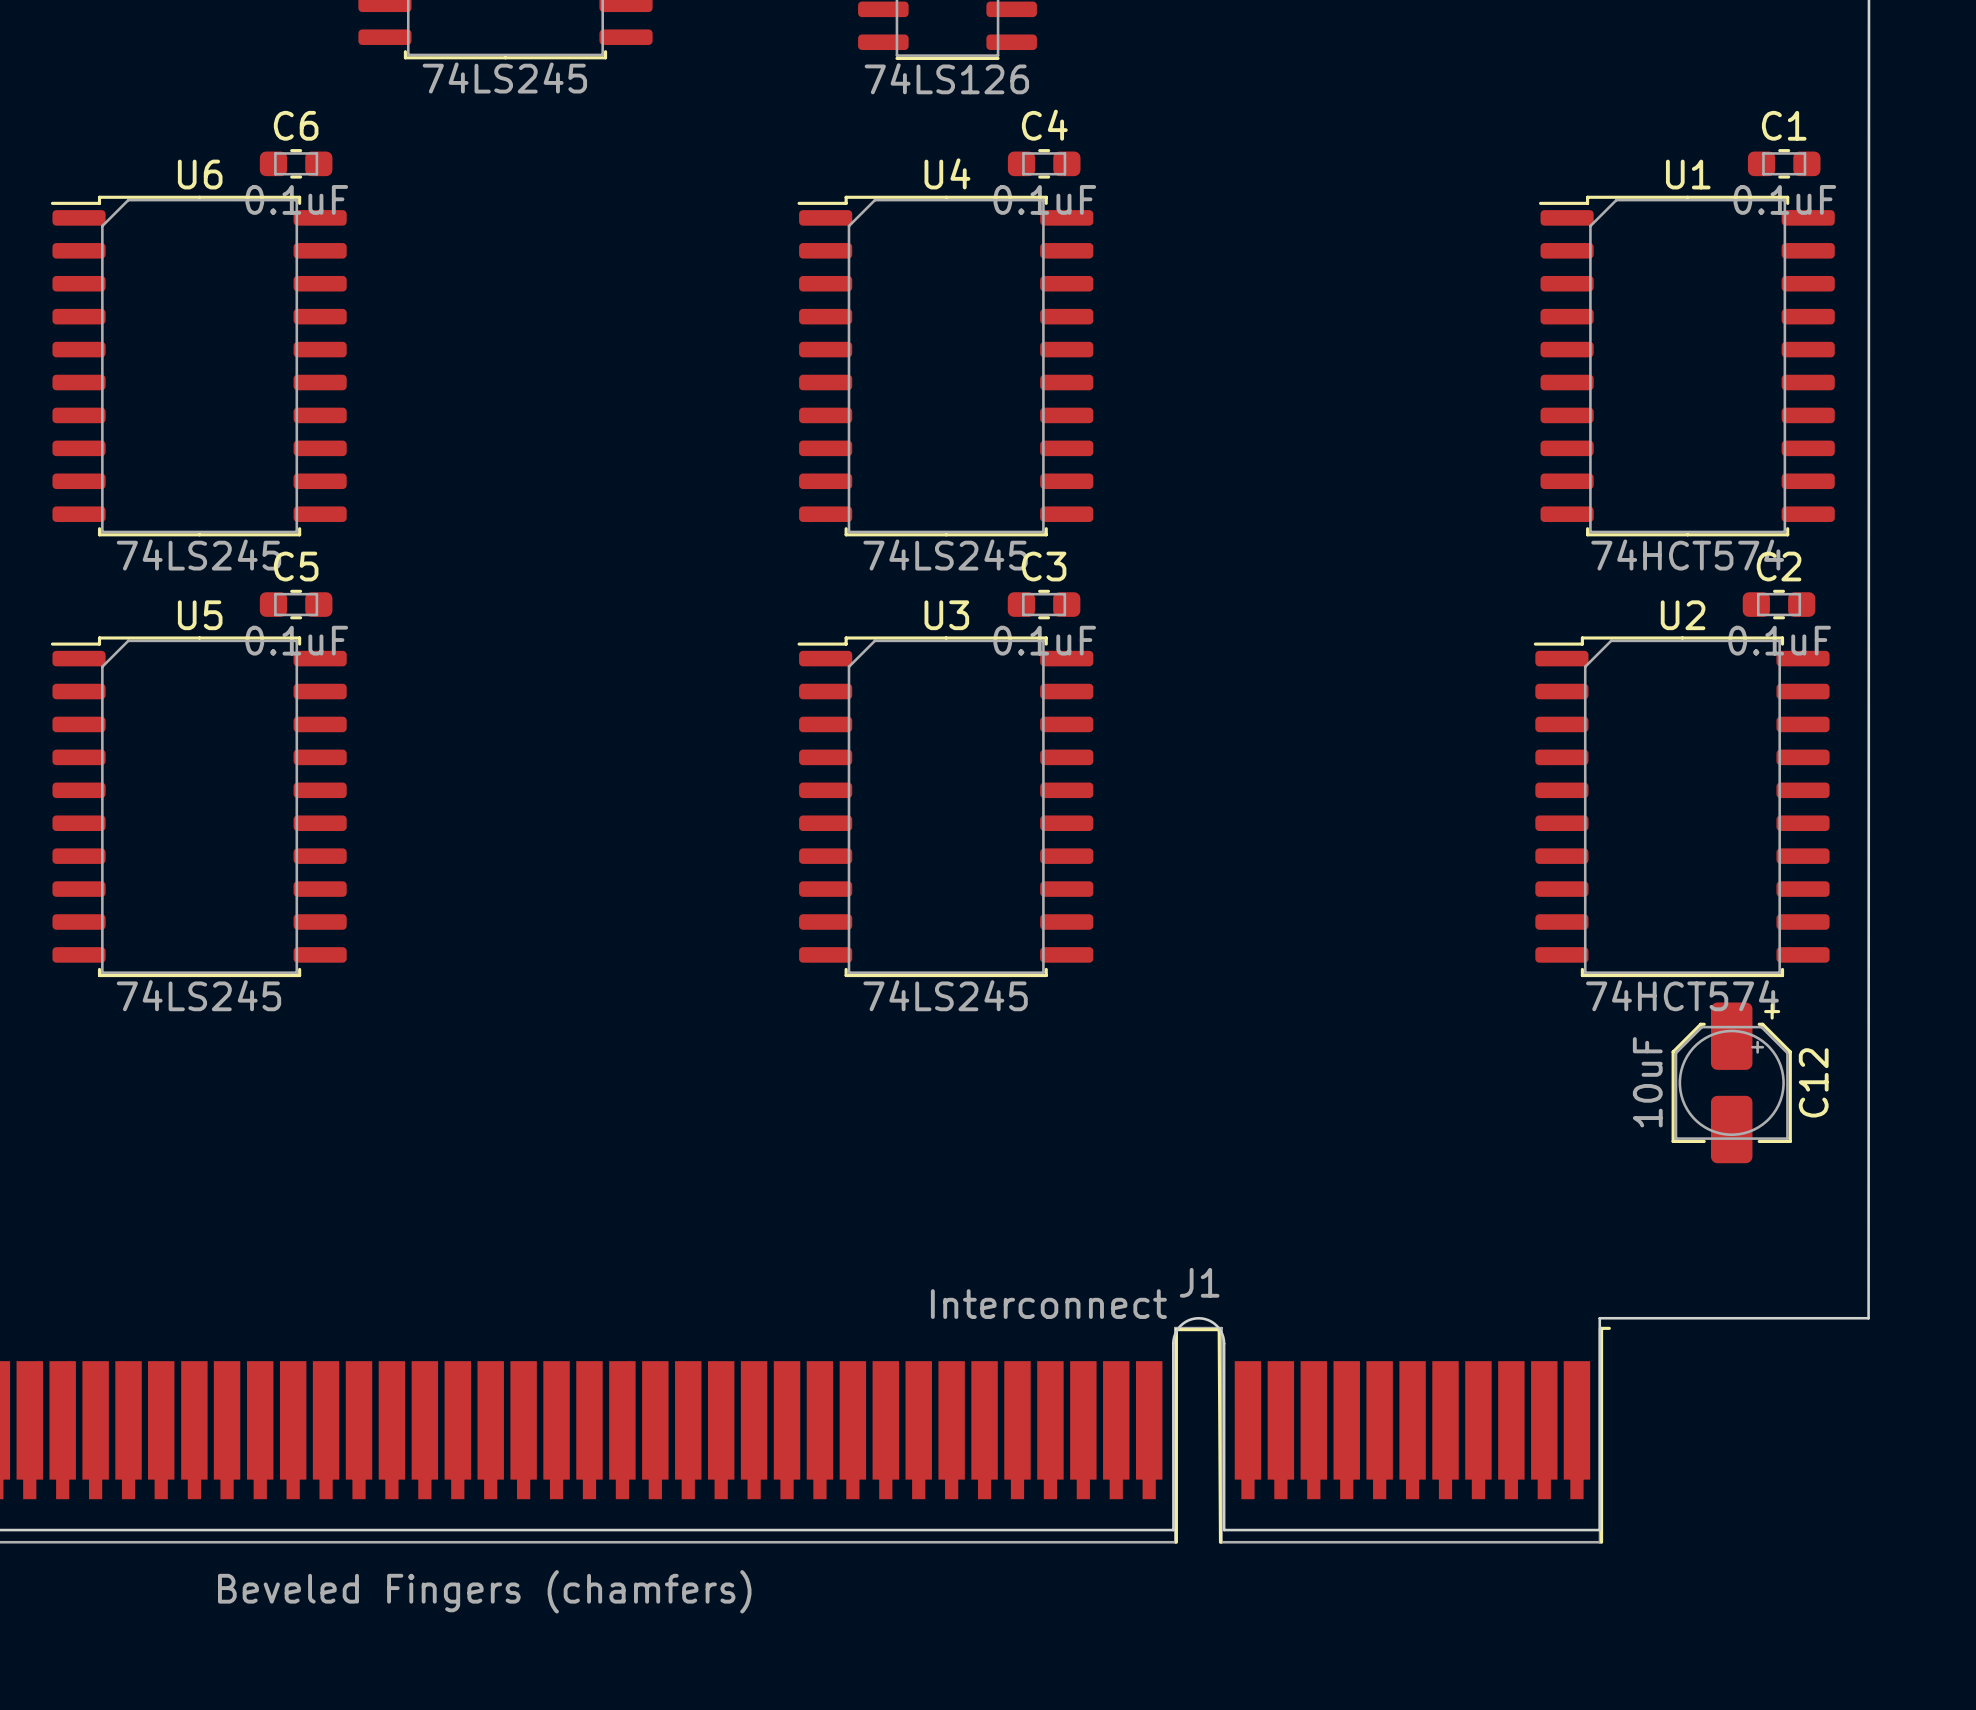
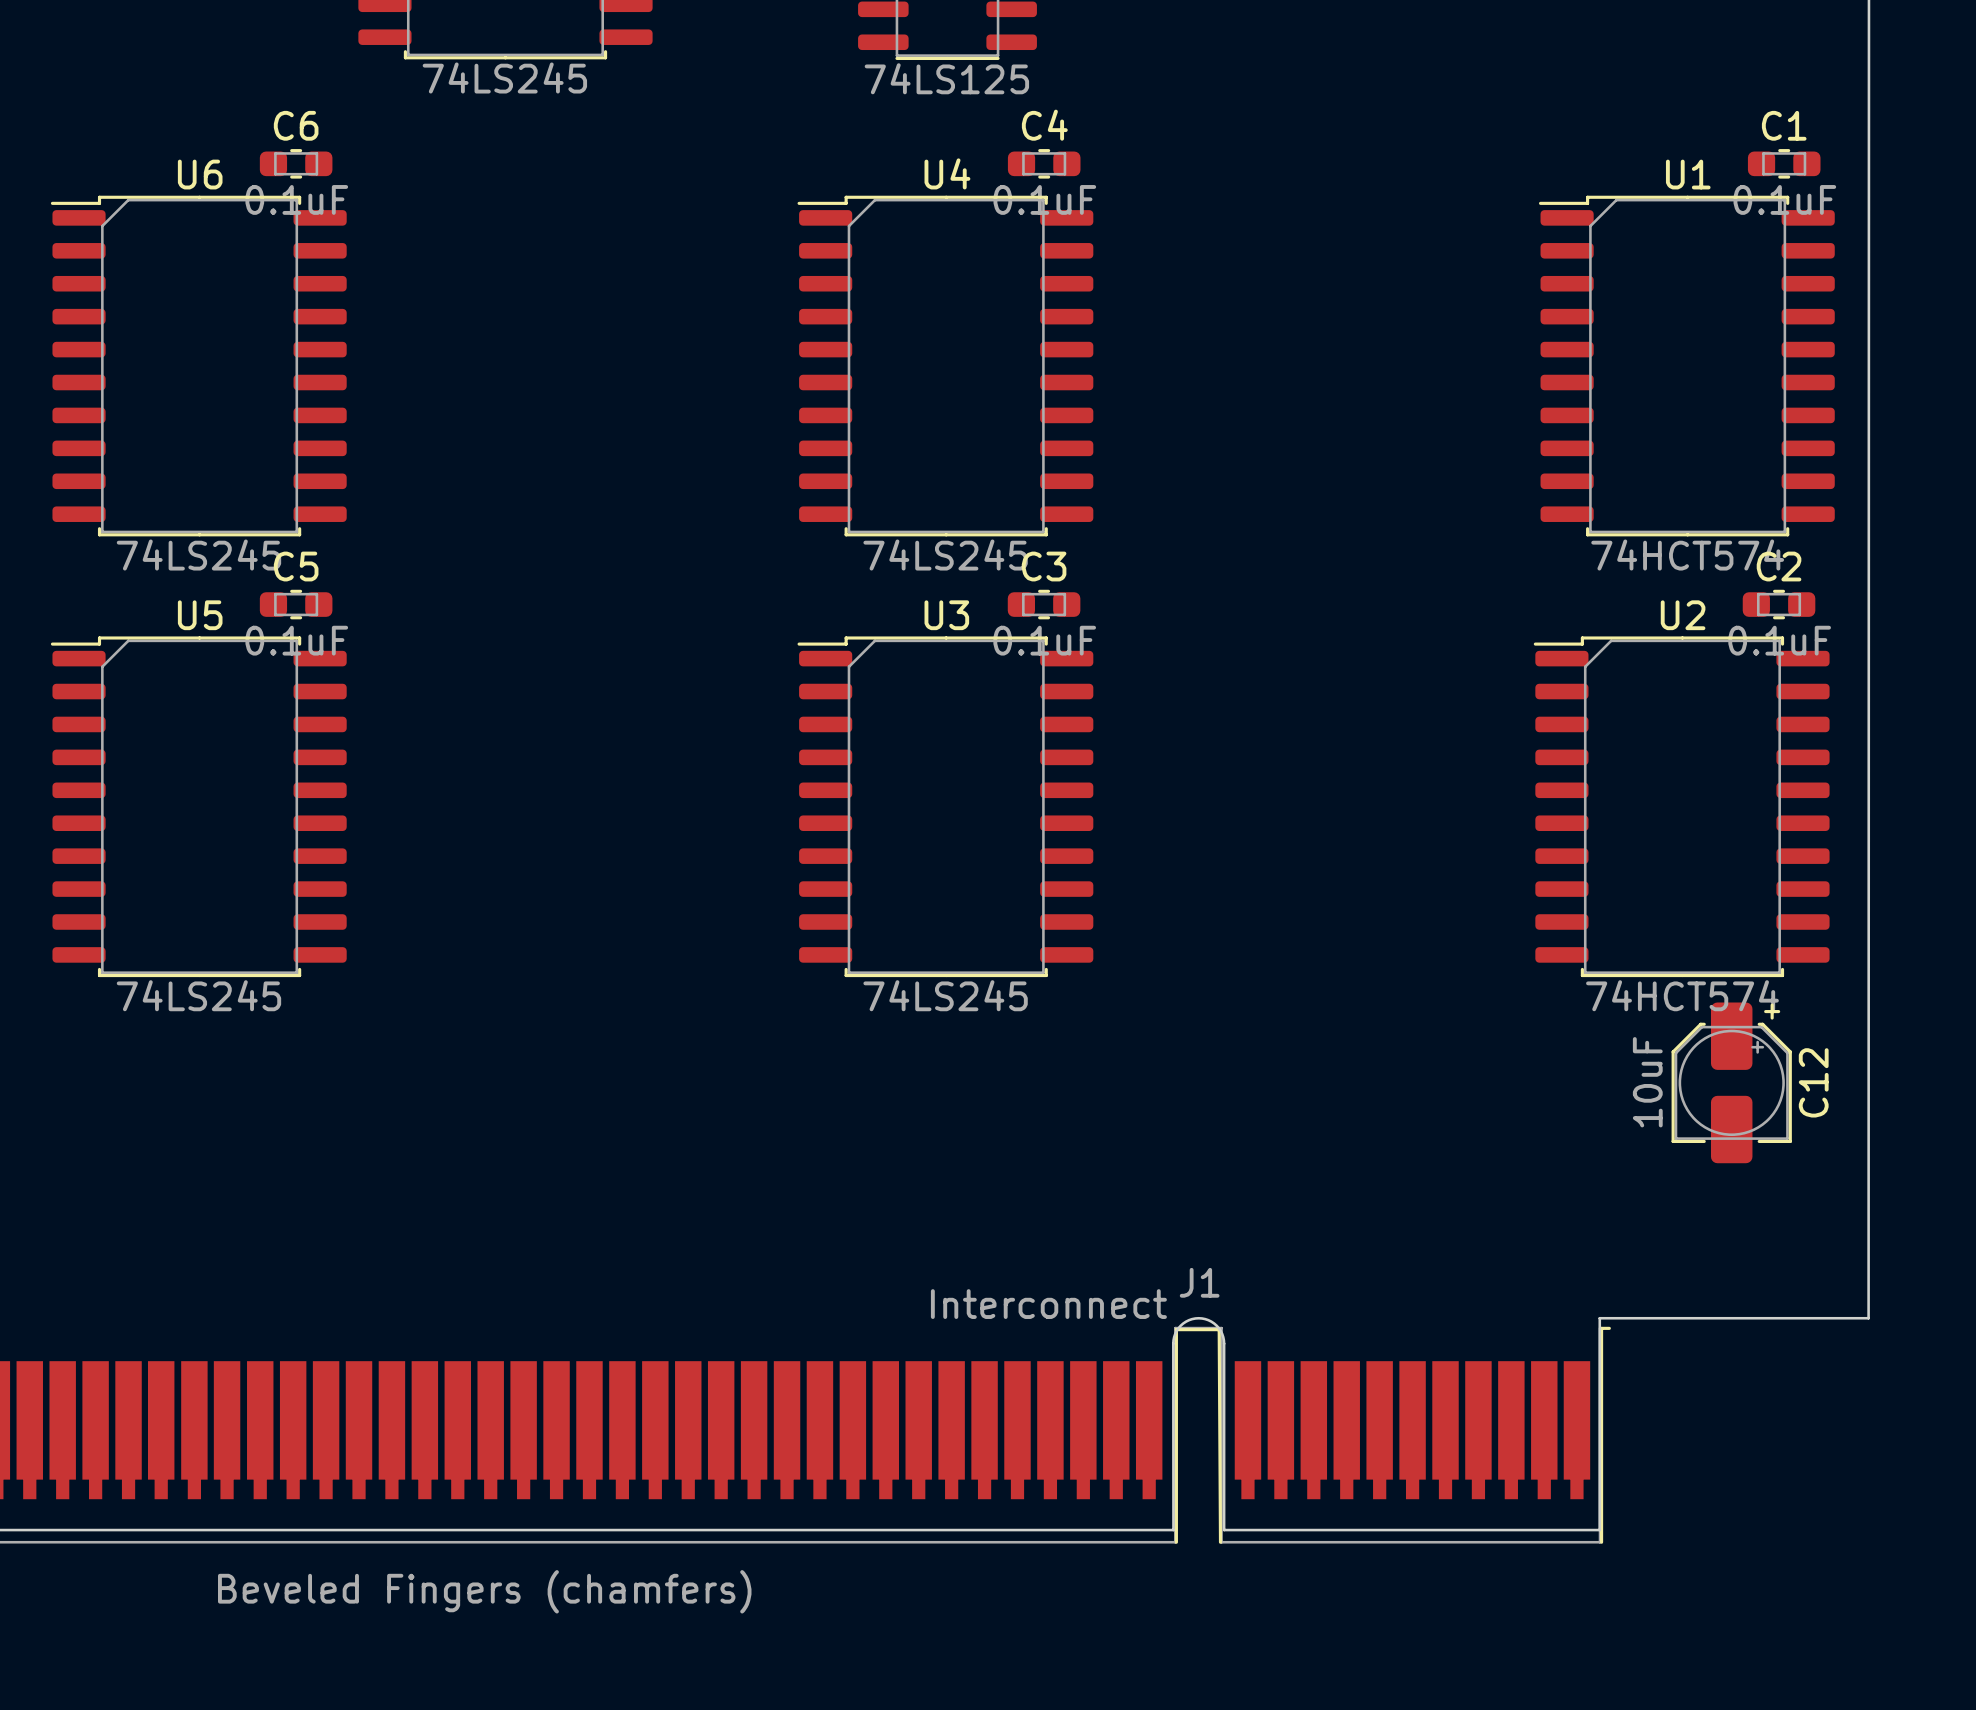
part value: 74LS126 (946, 78) -> 74LS125 (946, 78)

